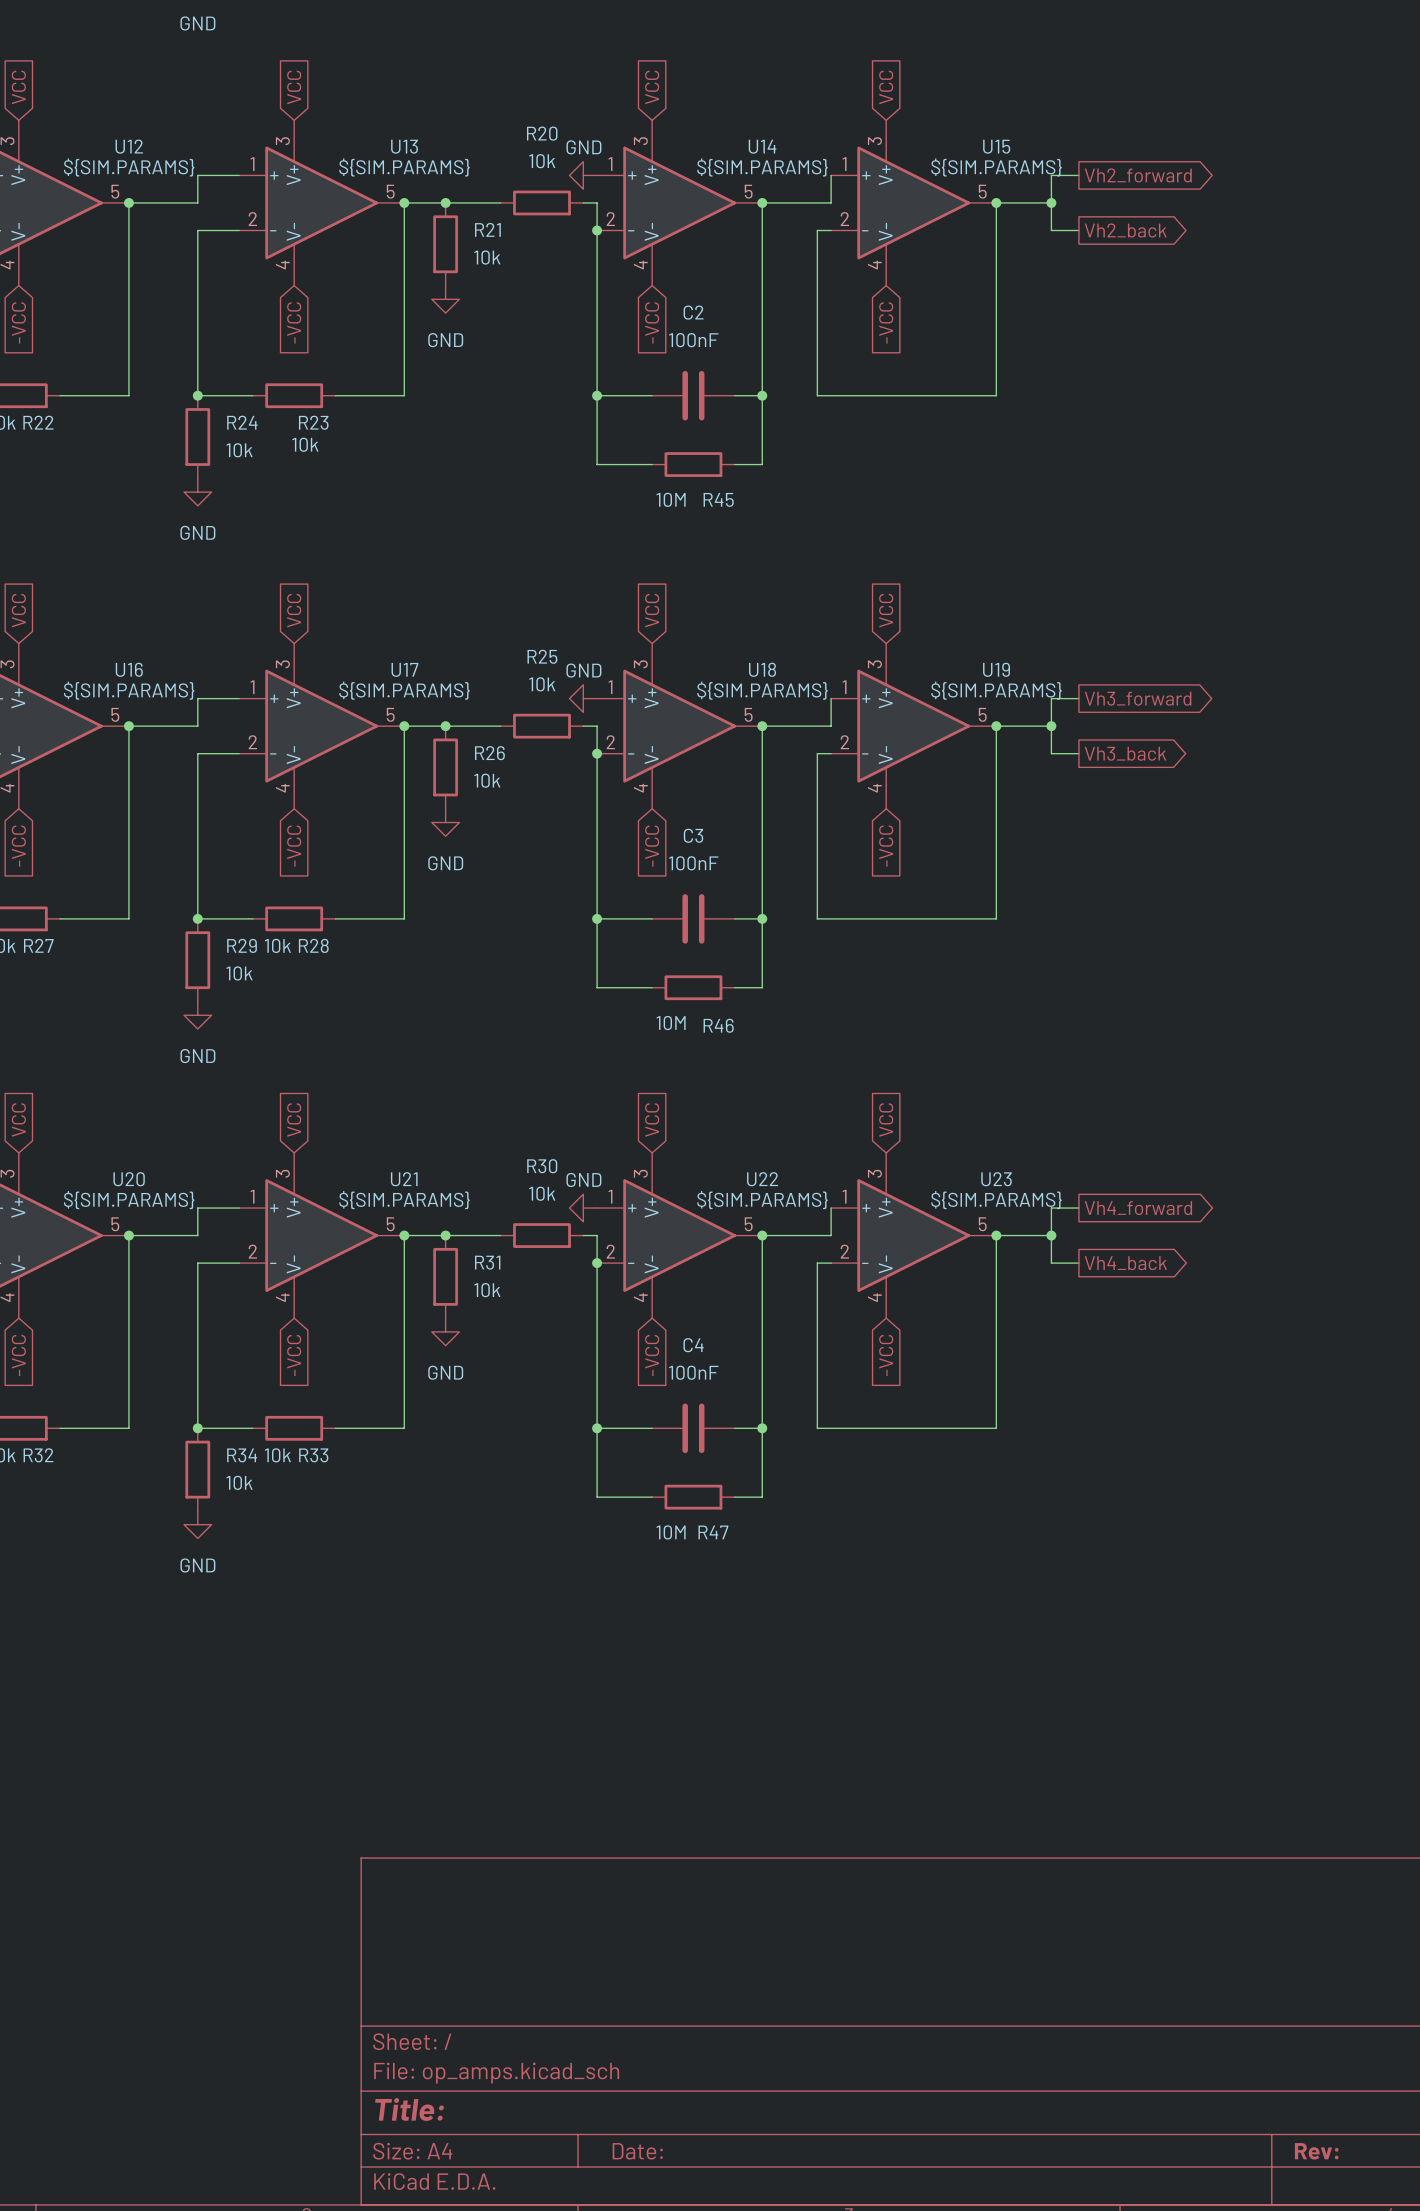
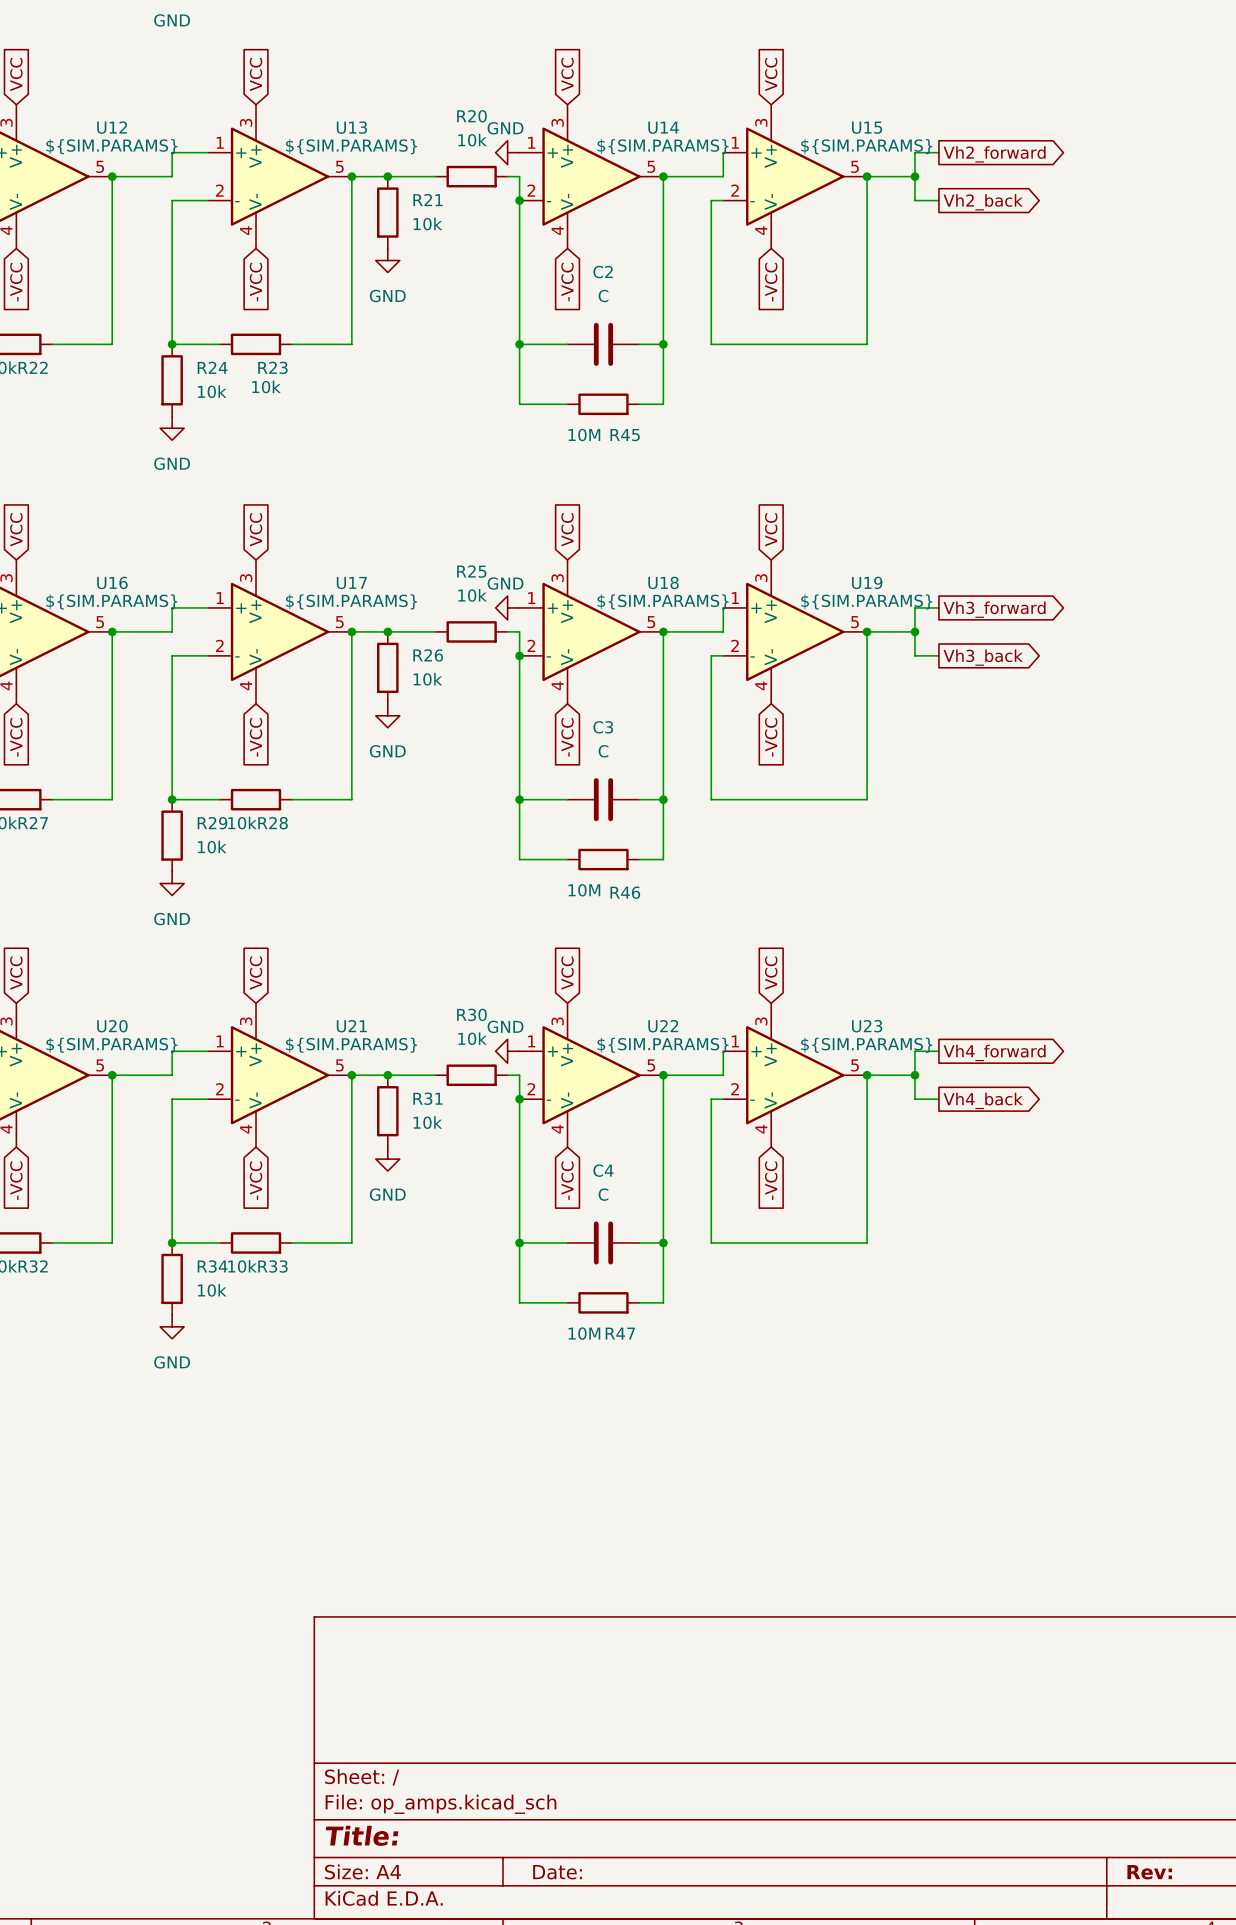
C2 value: 100nF (693, 340) -> C (603, 296)
C3 value: 100nF (693, 863) -> C (603, 751)
C4 value: 100nF (693, 1372) -> C (603, 1194)

